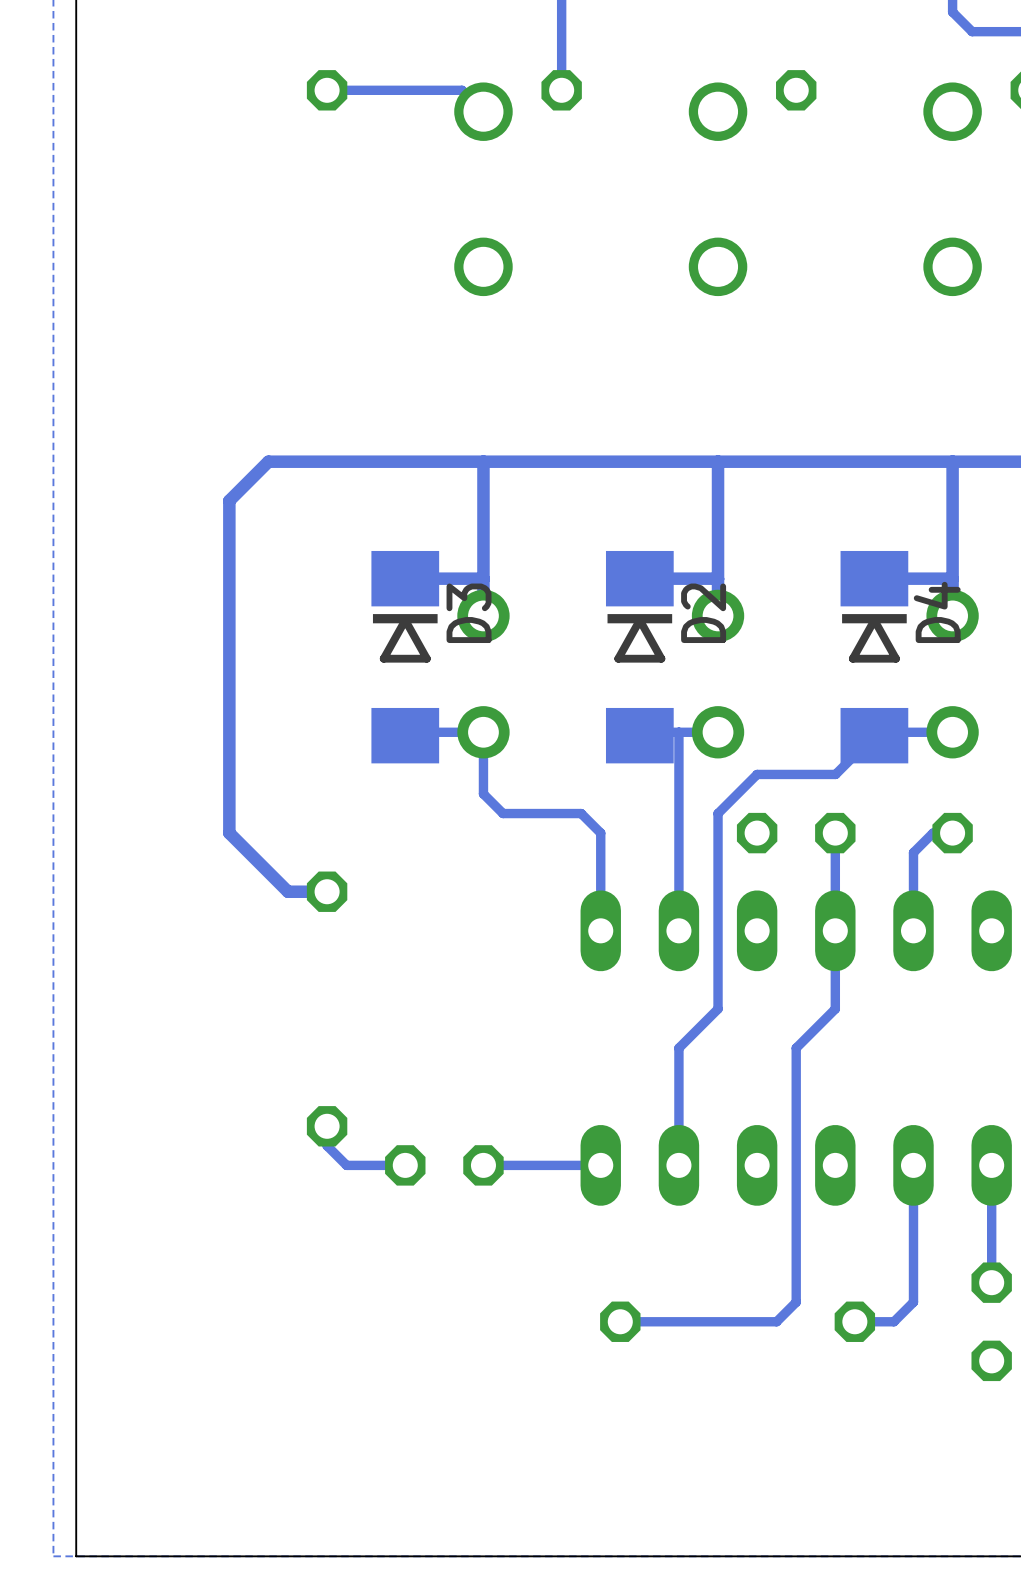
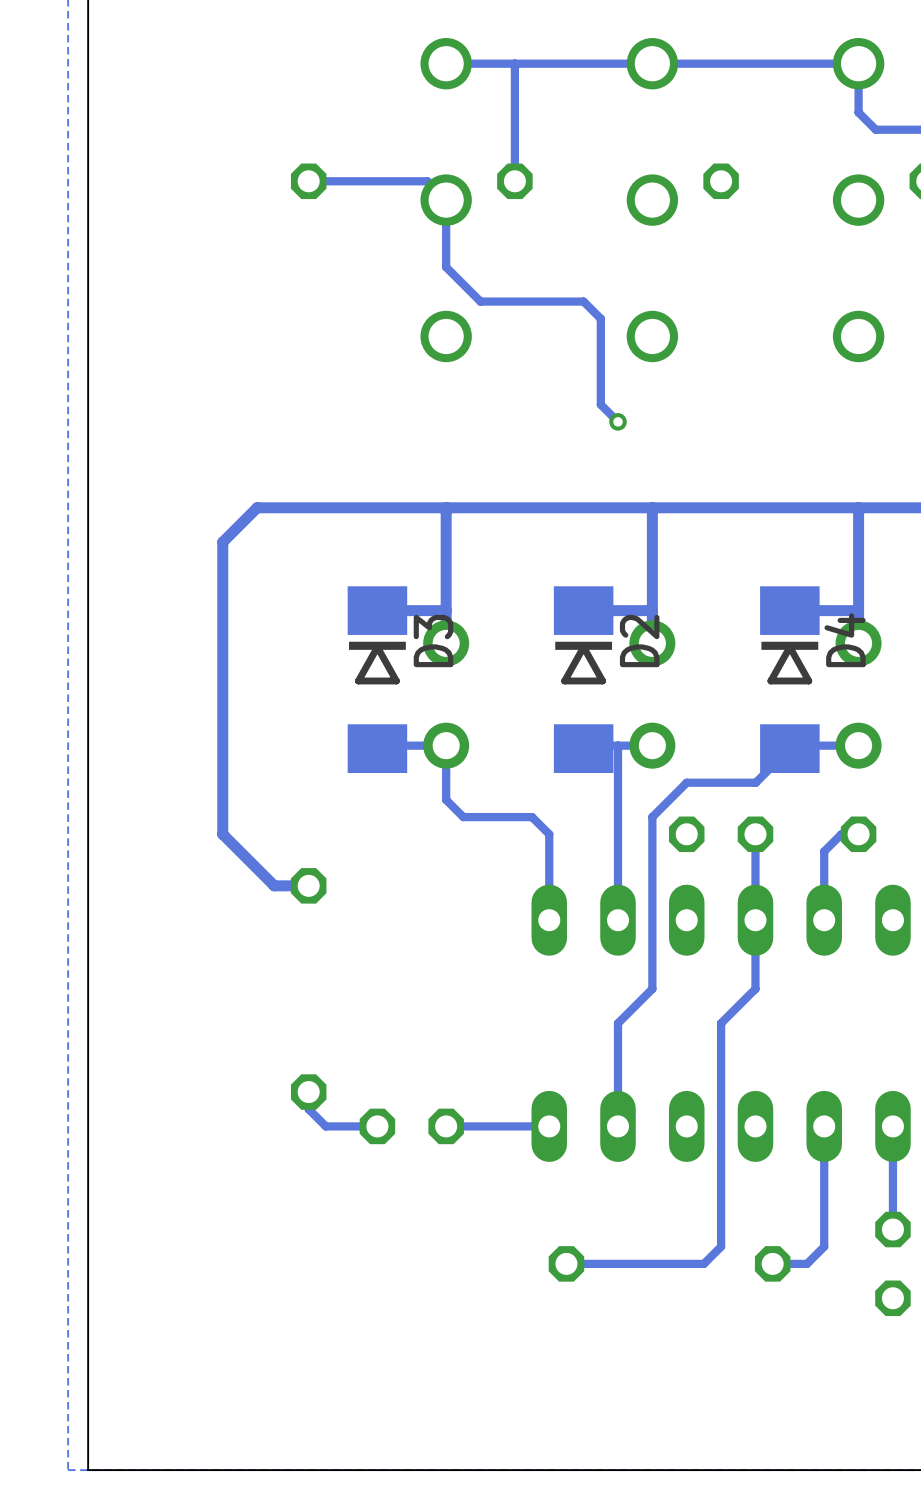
track: none -> (446, 200) (446, 267) (480, 301) (583, 301) (600, 318) (600, 404) (618, 421)
via: none -> (618, 421)

